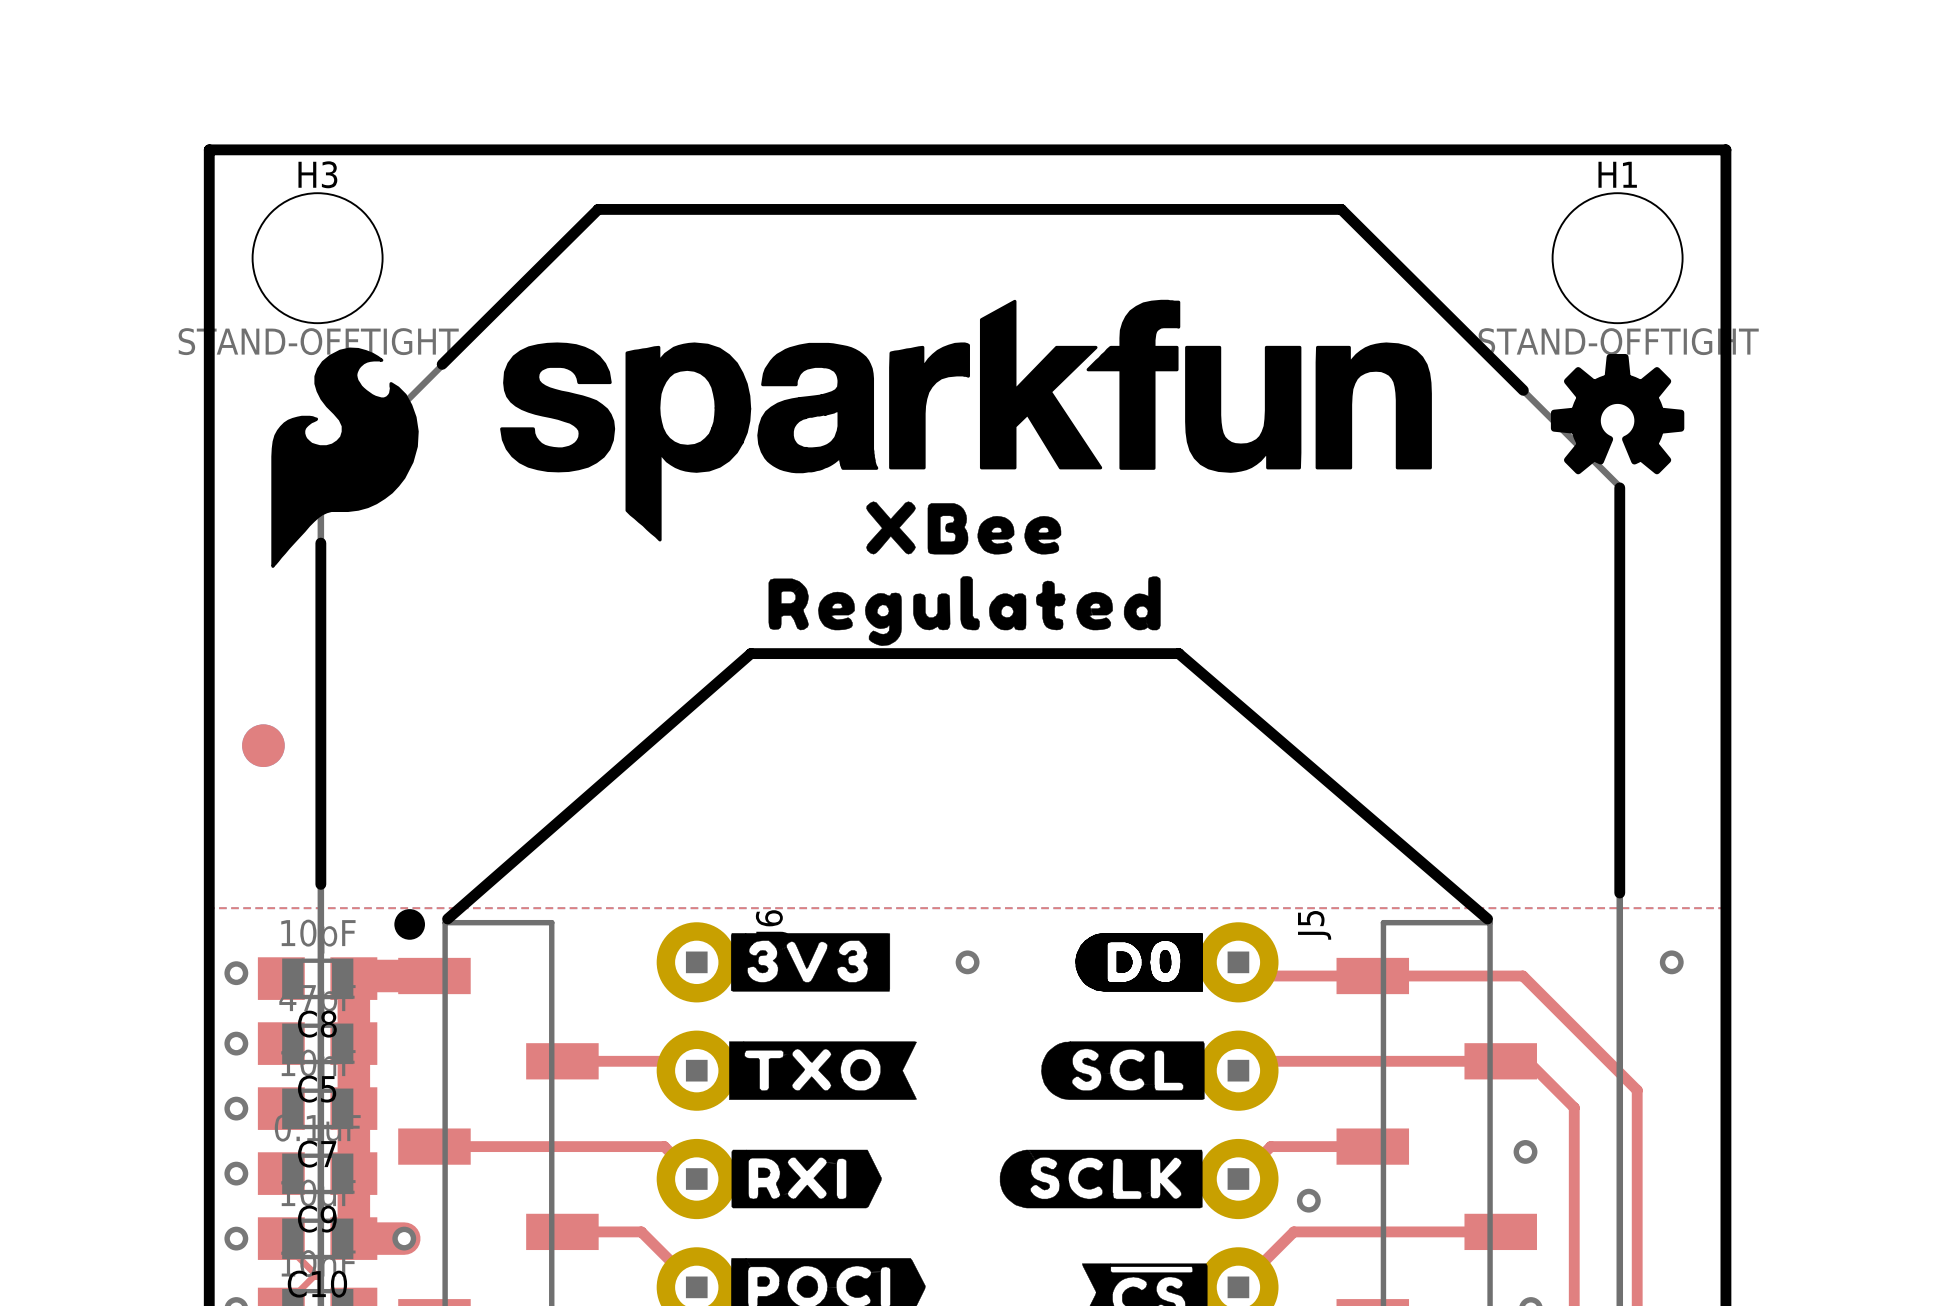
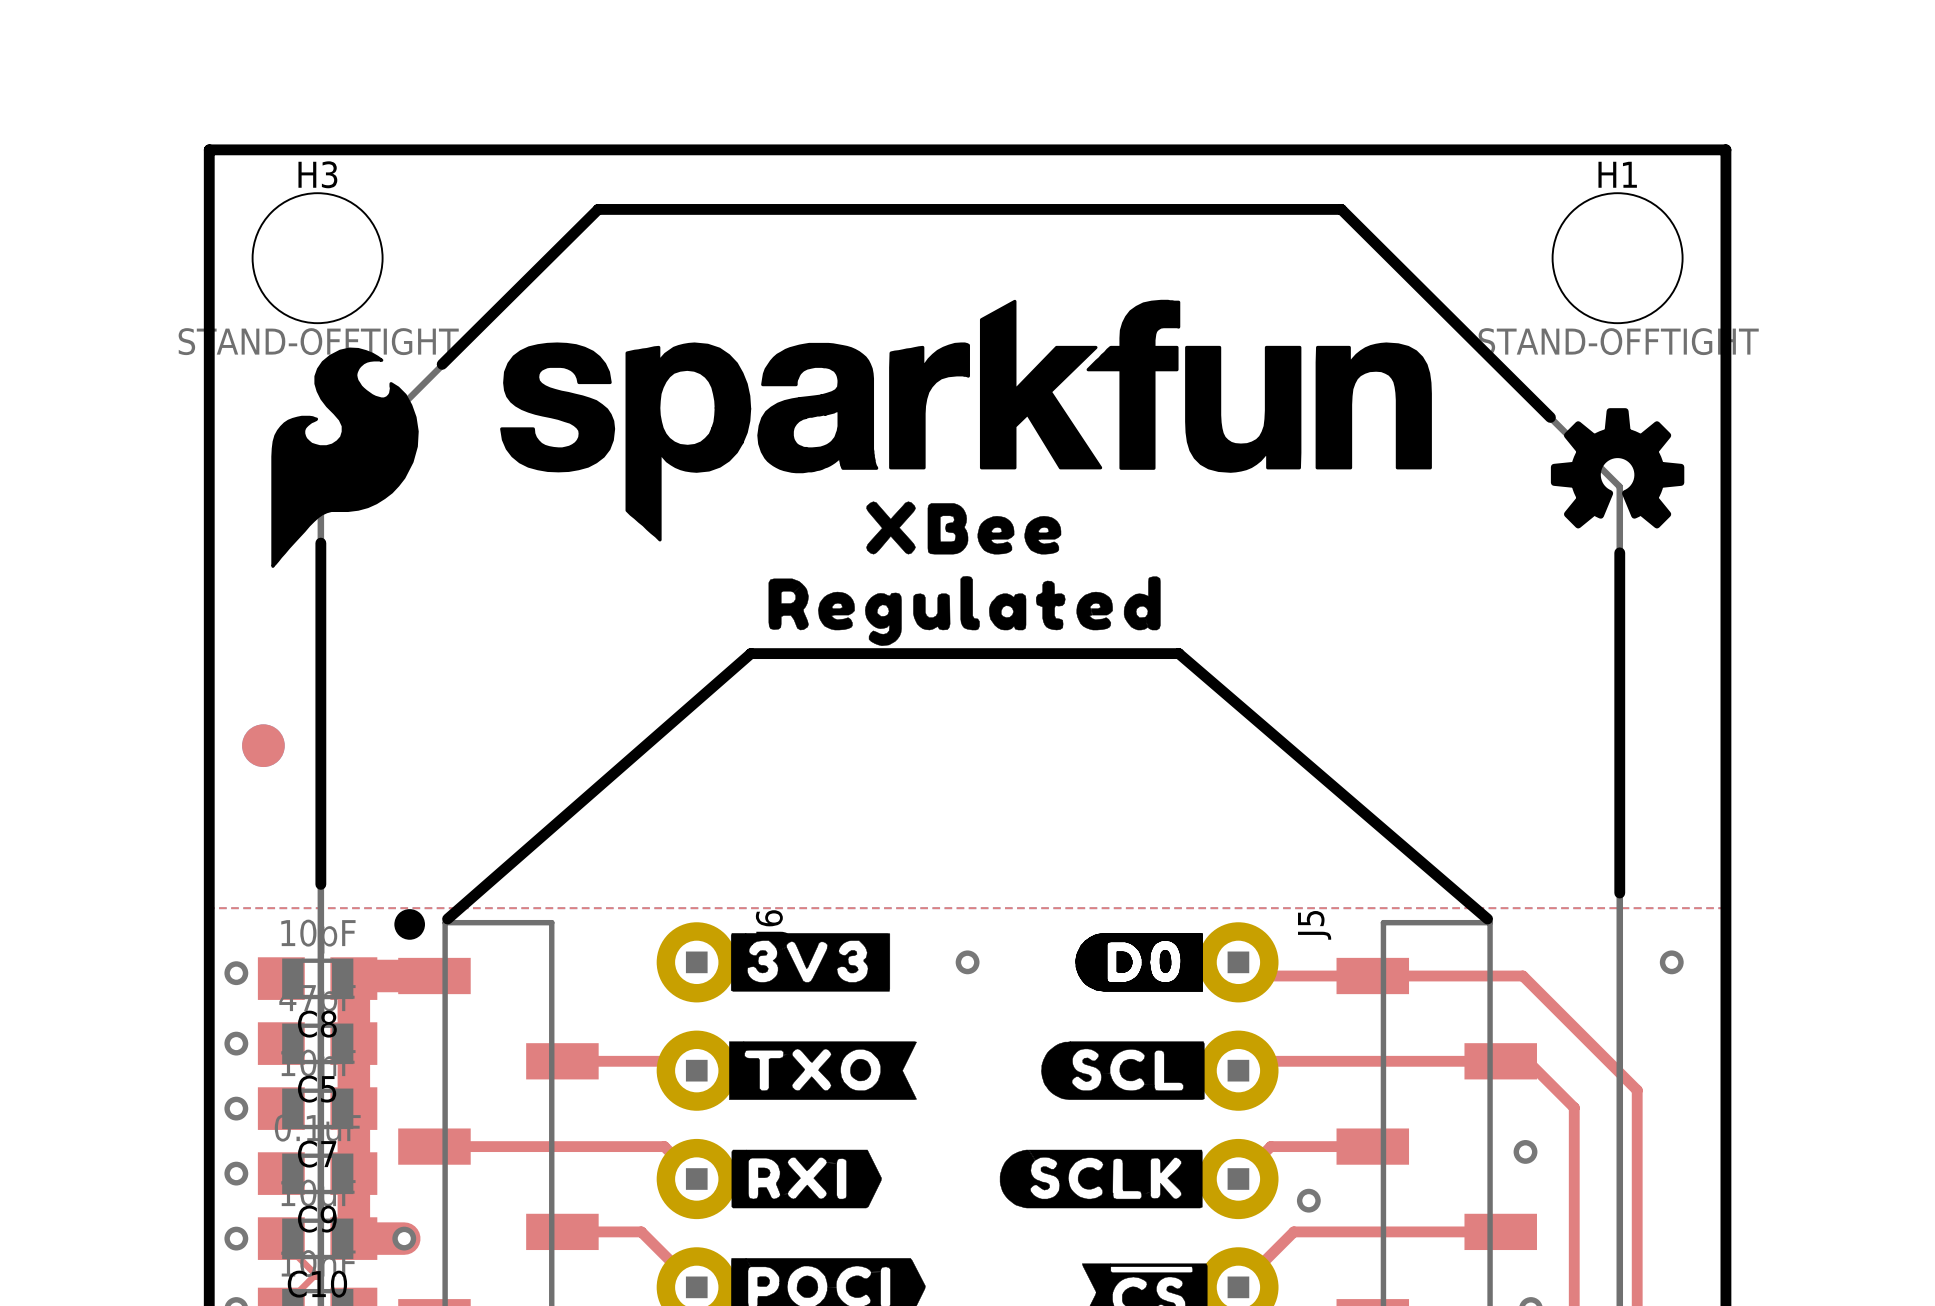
line: (1341, 209) (1523, 390) -> (1341, 209) (1550, 417)
drawing position: (1617, 414) -> (1617, 468)
line: (1619, 487) (1619, 552) -> none

